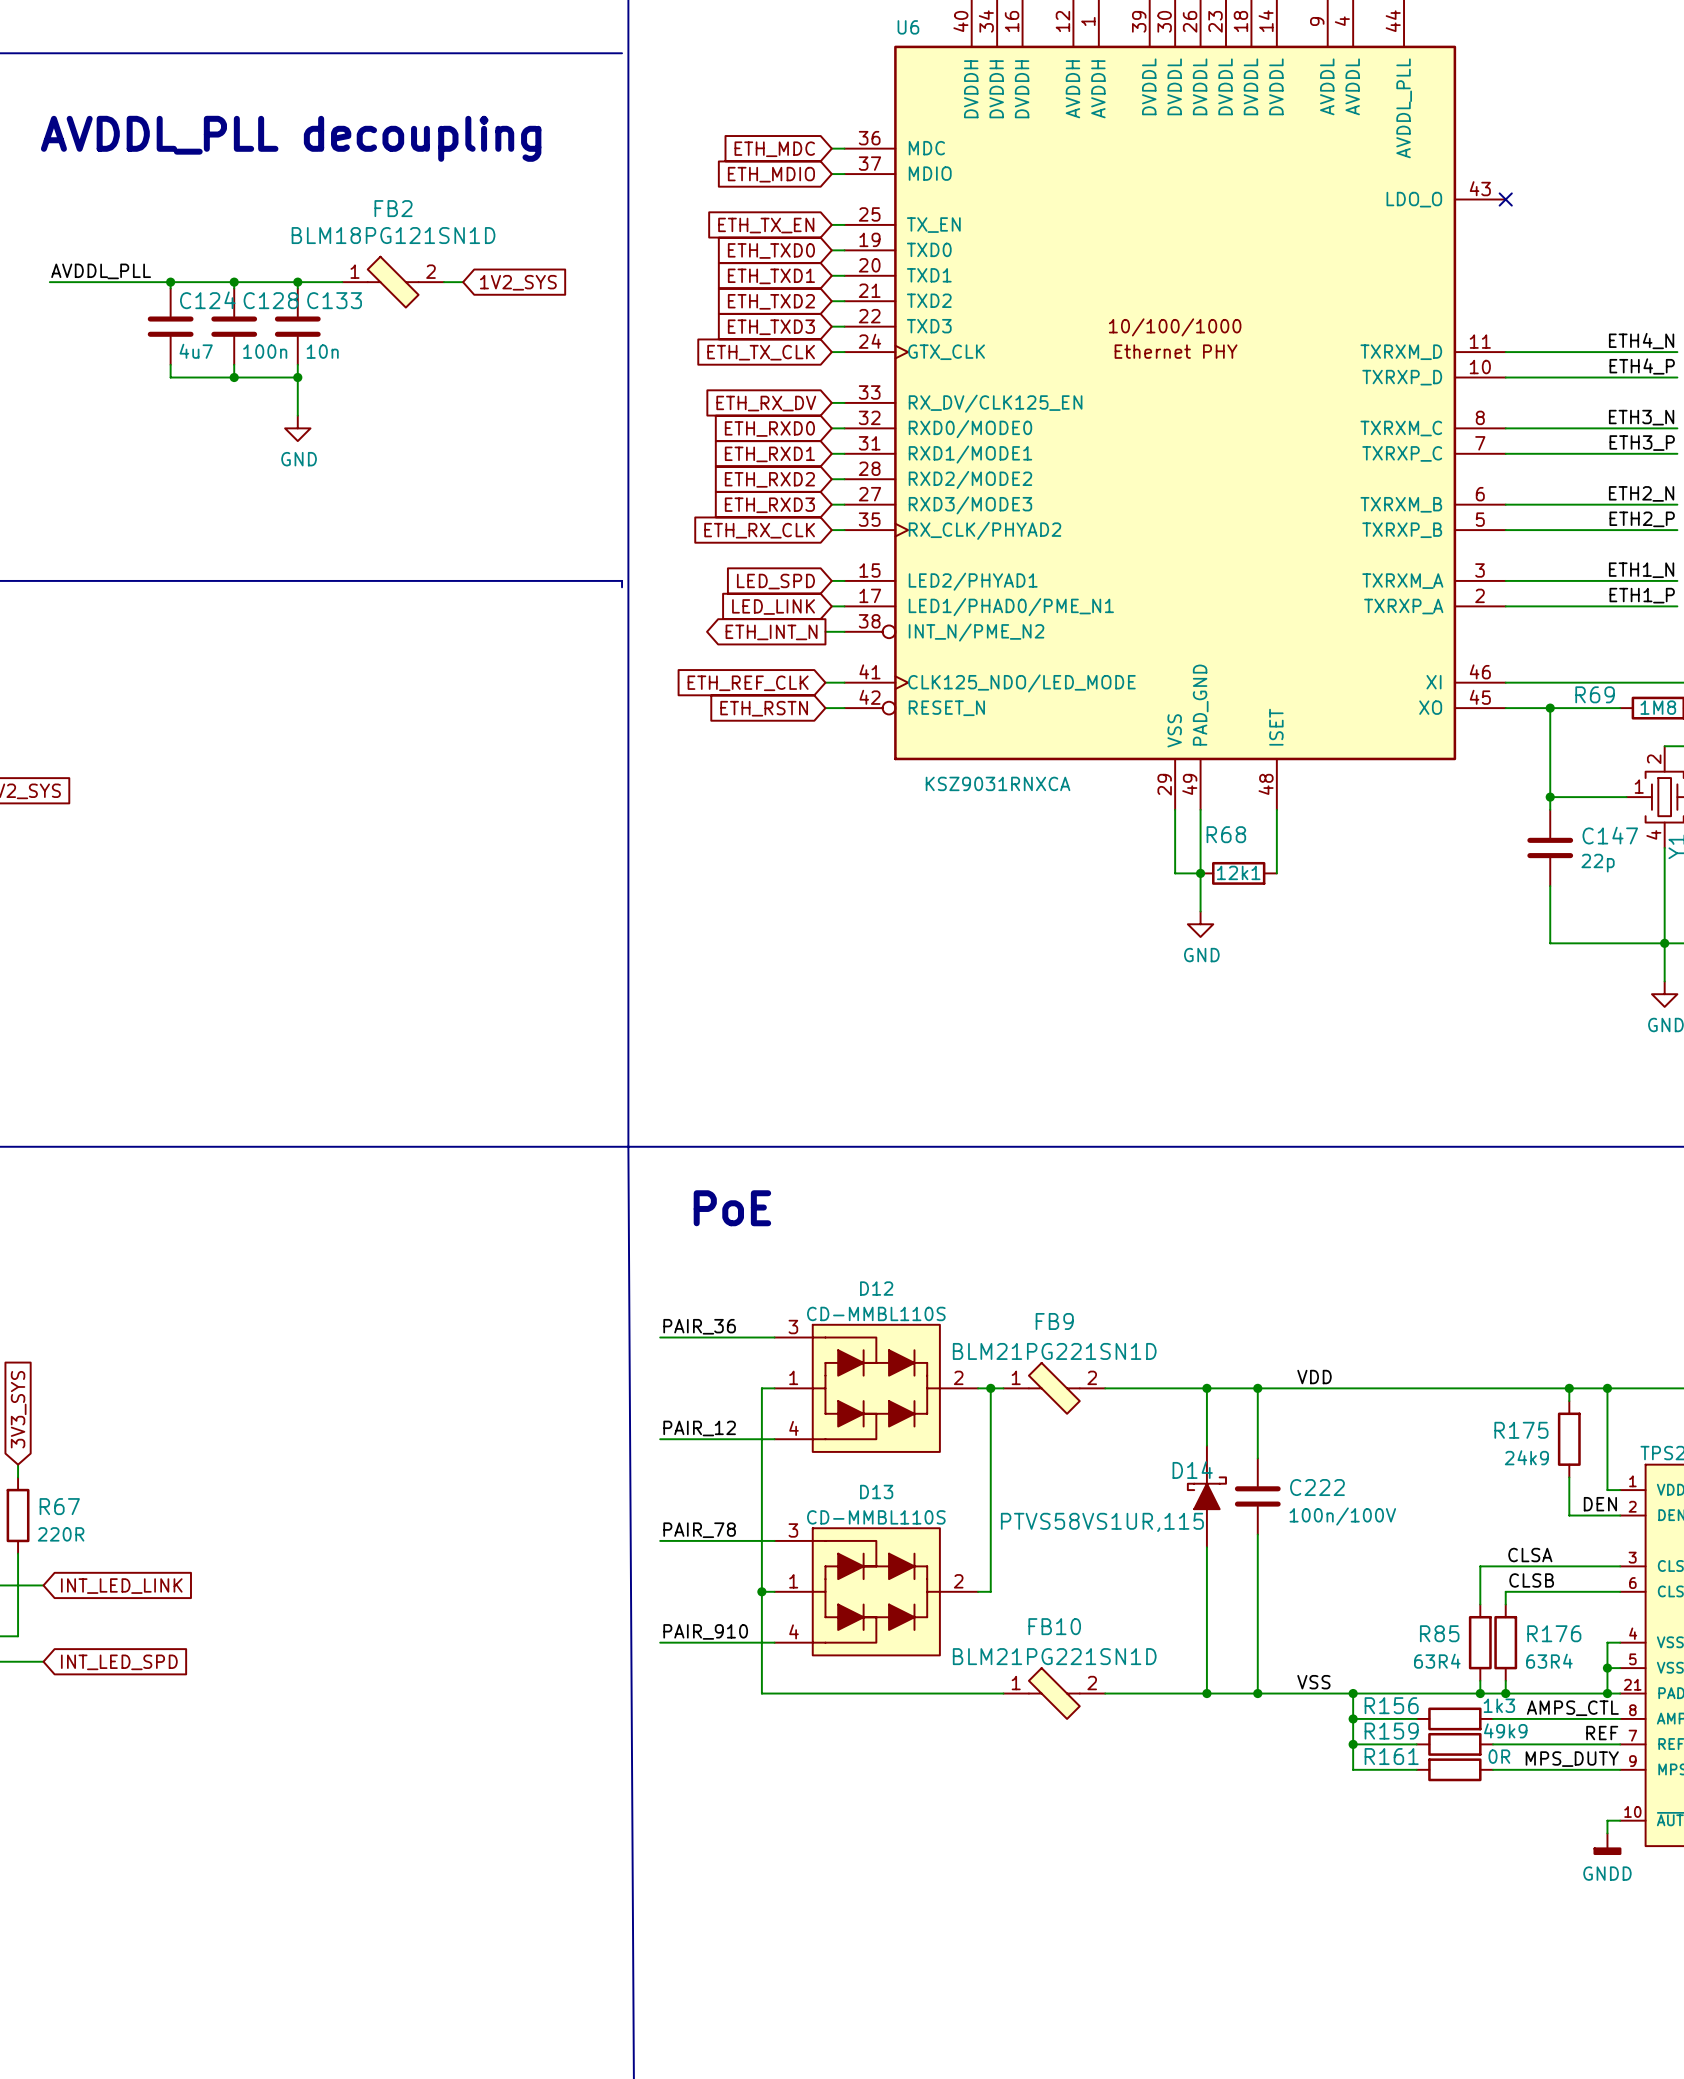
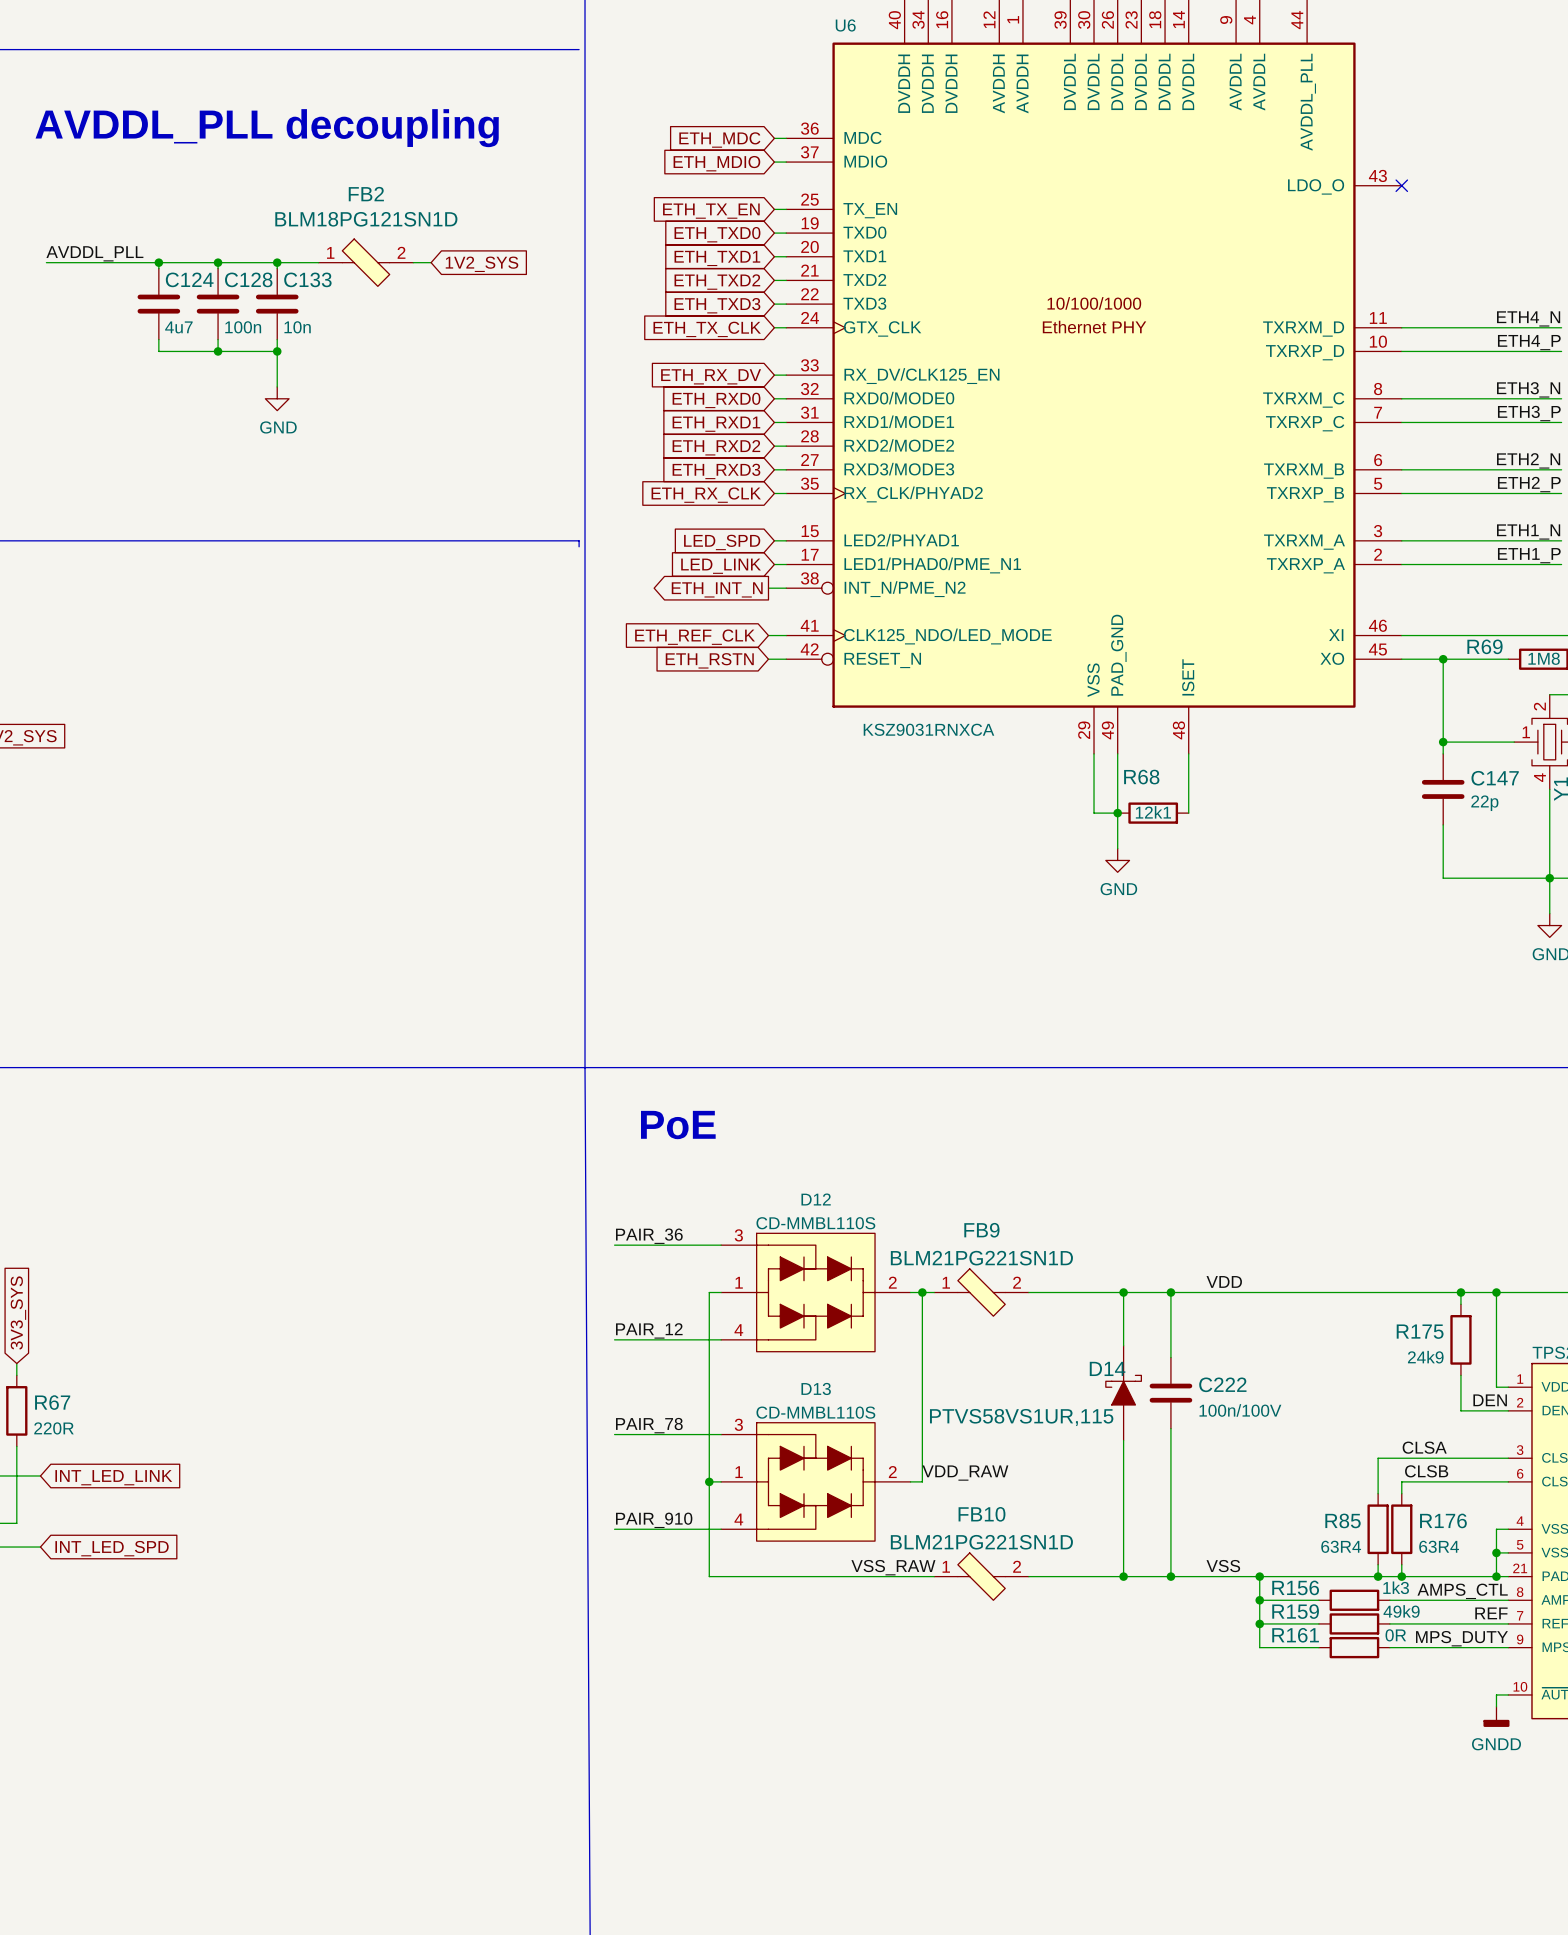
label: none -> VDD_RAW (965, 1473)
label: none -> VSS_RAW (893, 1567)

